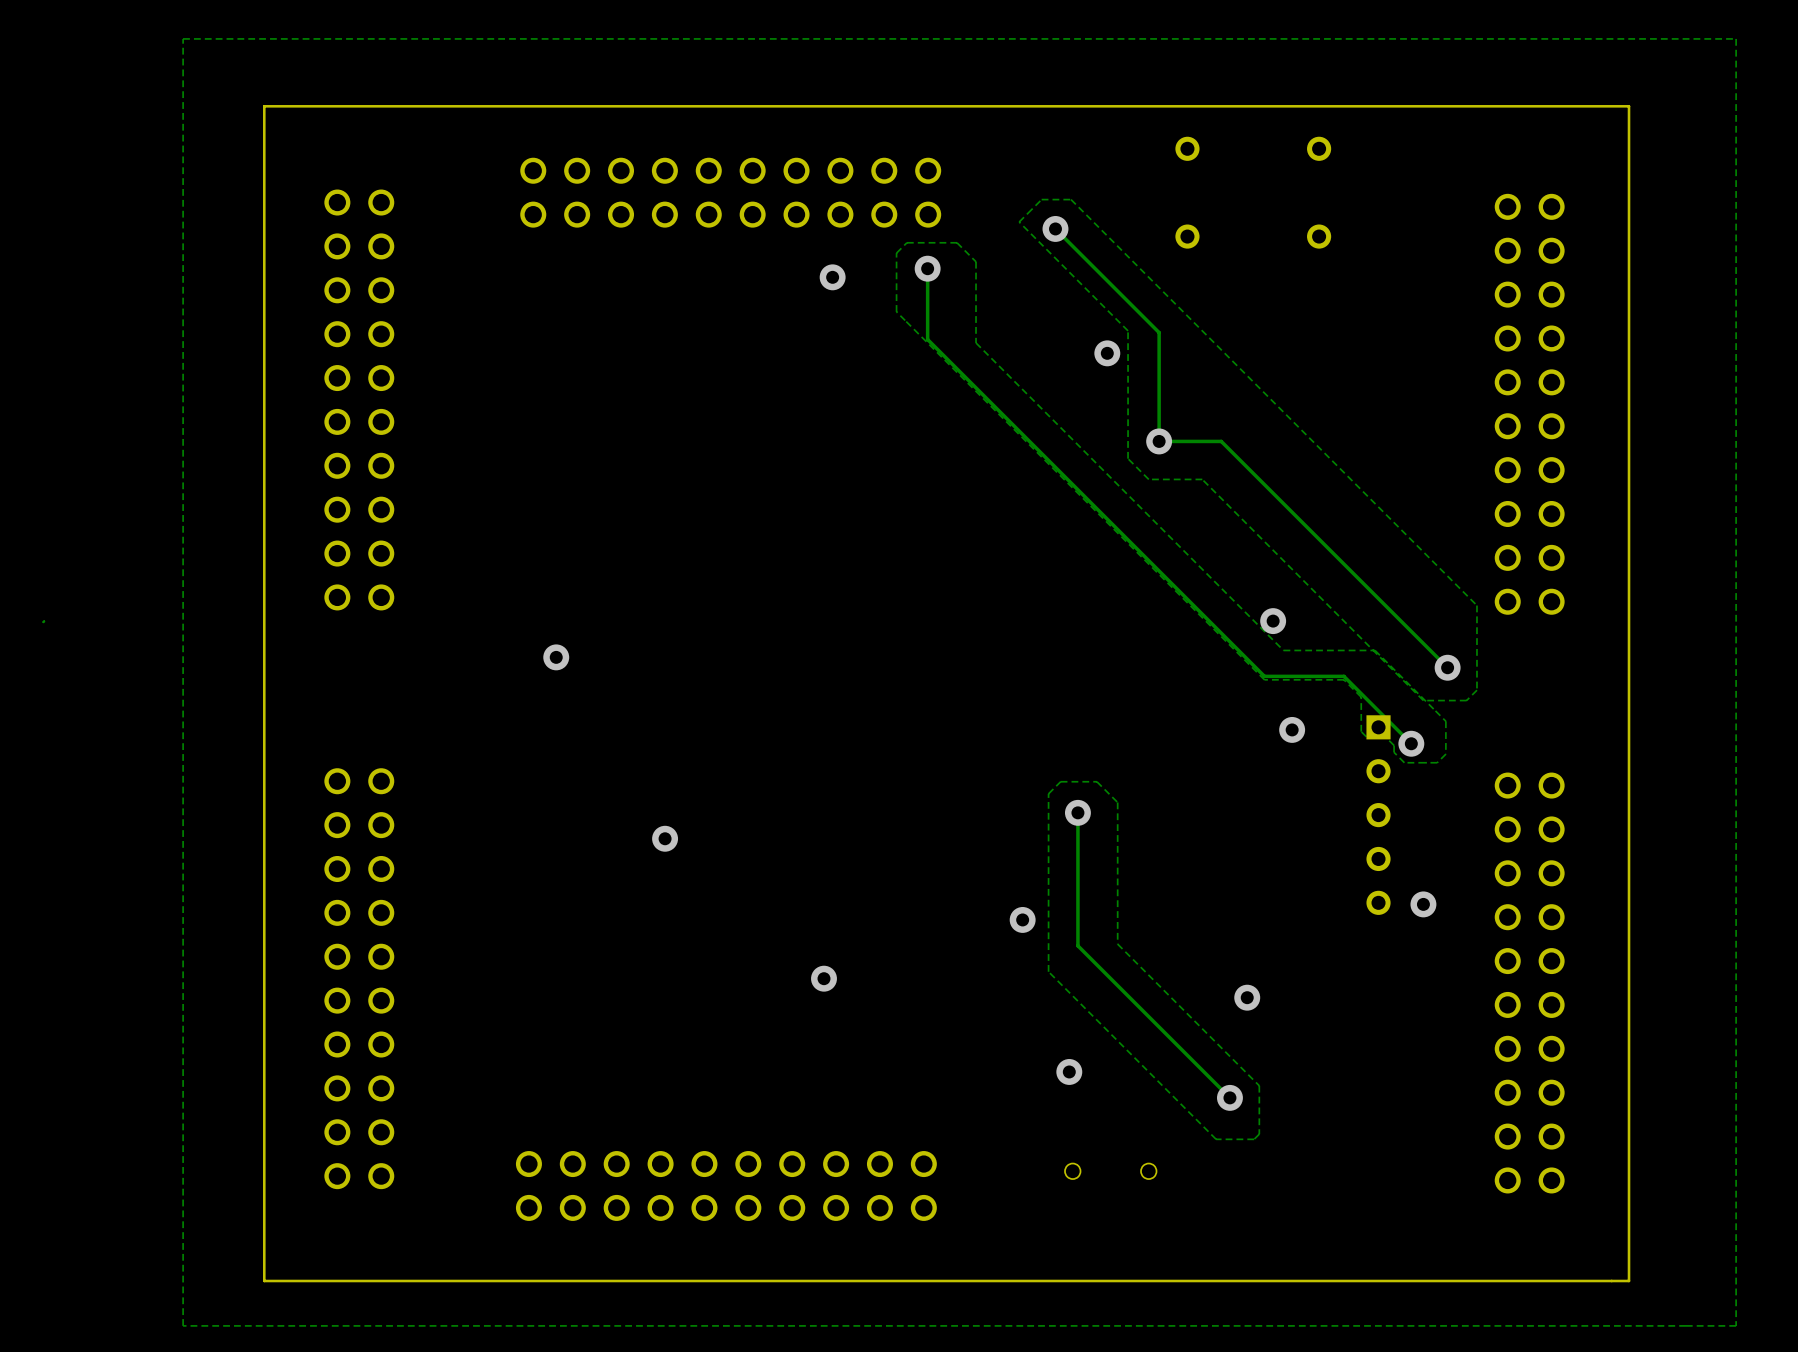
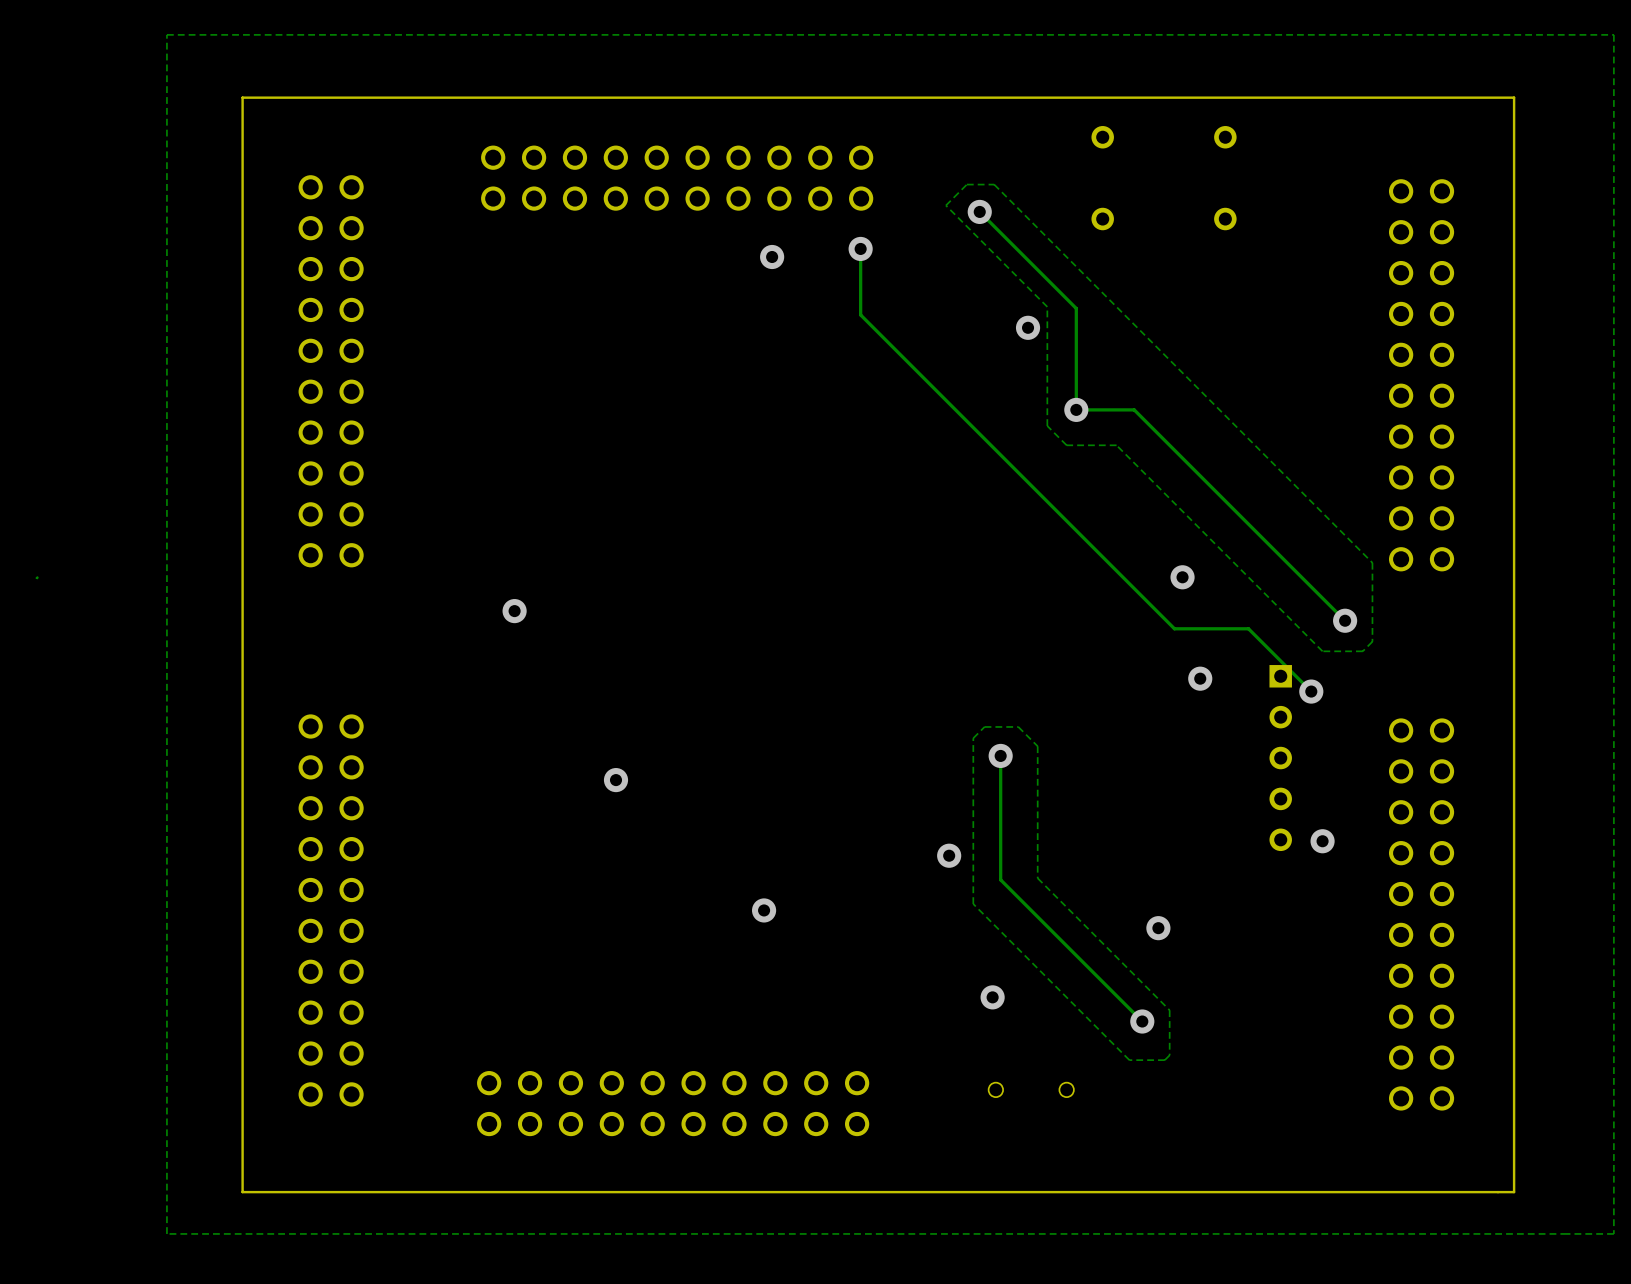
zone outline: (957, 242) (906, 242) (896, 253) (896, 311) (1264, 679) (1343, 679) (1361, 697) (1361, 731) (1366, 736) (1385, 736) (1394, 745) (1394, 752) (1404, 762) (1437, 762) (1445, 754) (1445, 721) (1375, 650) (1283, 650) (976, 342) (976, 261) (957, 242) -> none

